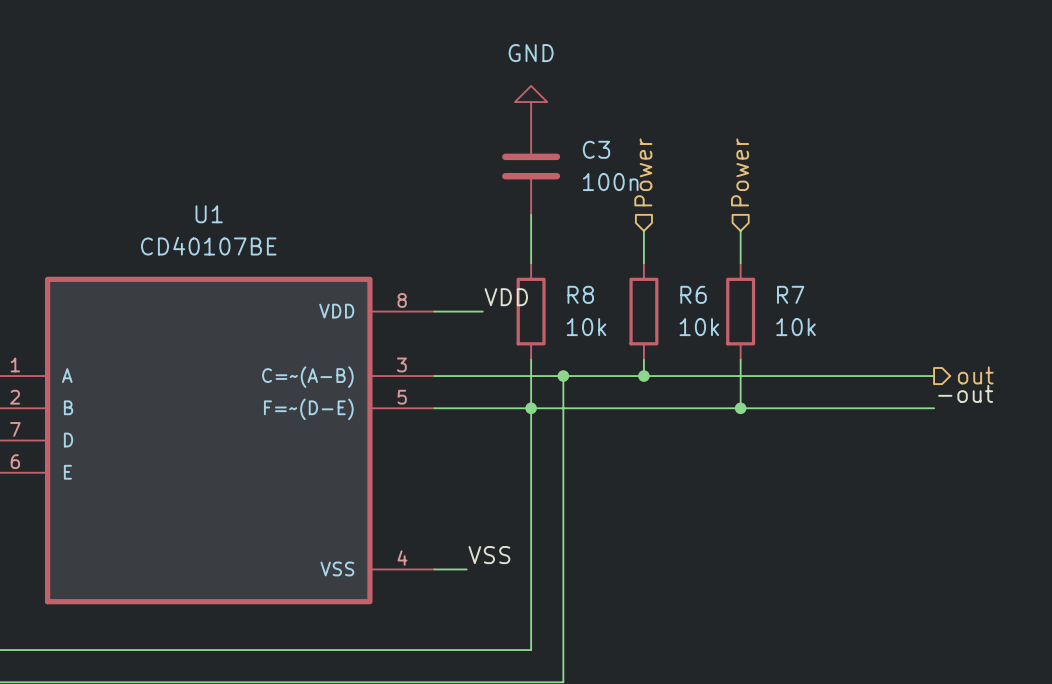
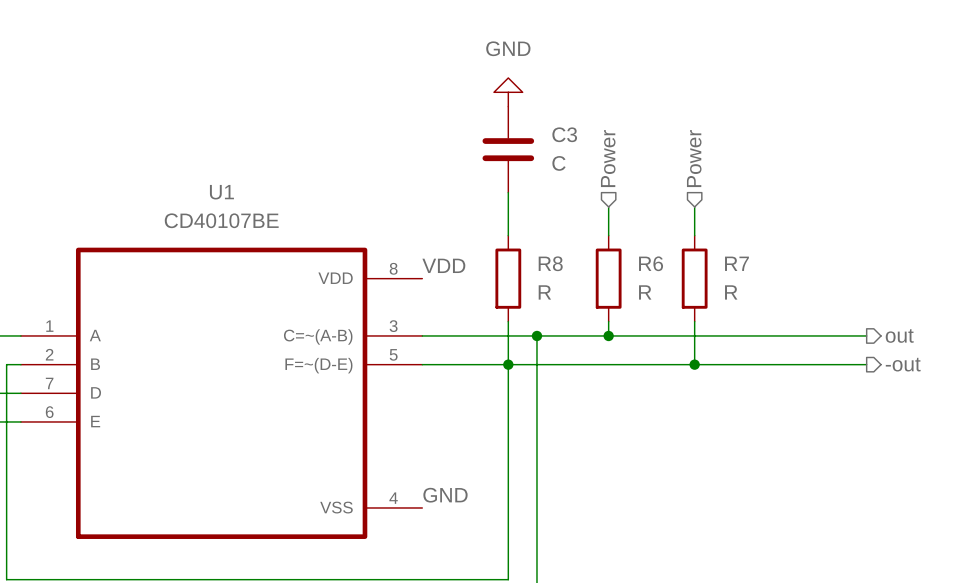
C3 value: 100n (610, 182) -> C (558, 163)
label position: VDD (506, 297) -> VDD (443, 265)
wire: (434, 311) (482, 311) -> none
R8 value: 10k (586, 327) -> R (544, 292)
R6 value: 10k (699, 327) -> R (645, 292)
R7 value: 10k (796, 327) -> R (731, 292)
label: -out (965, 393) -> none
hierarchical label: none -> -out (903, 364)
label: none -> GND (445, 495)
label: VSS (489, 555) -> none
wire: (434, 569) (466, 569) -> none

